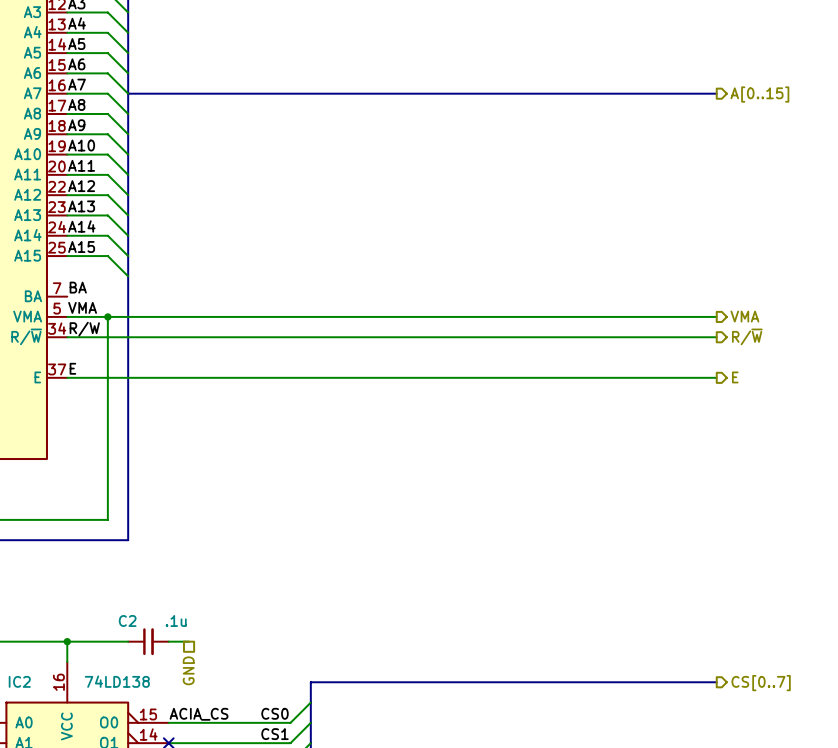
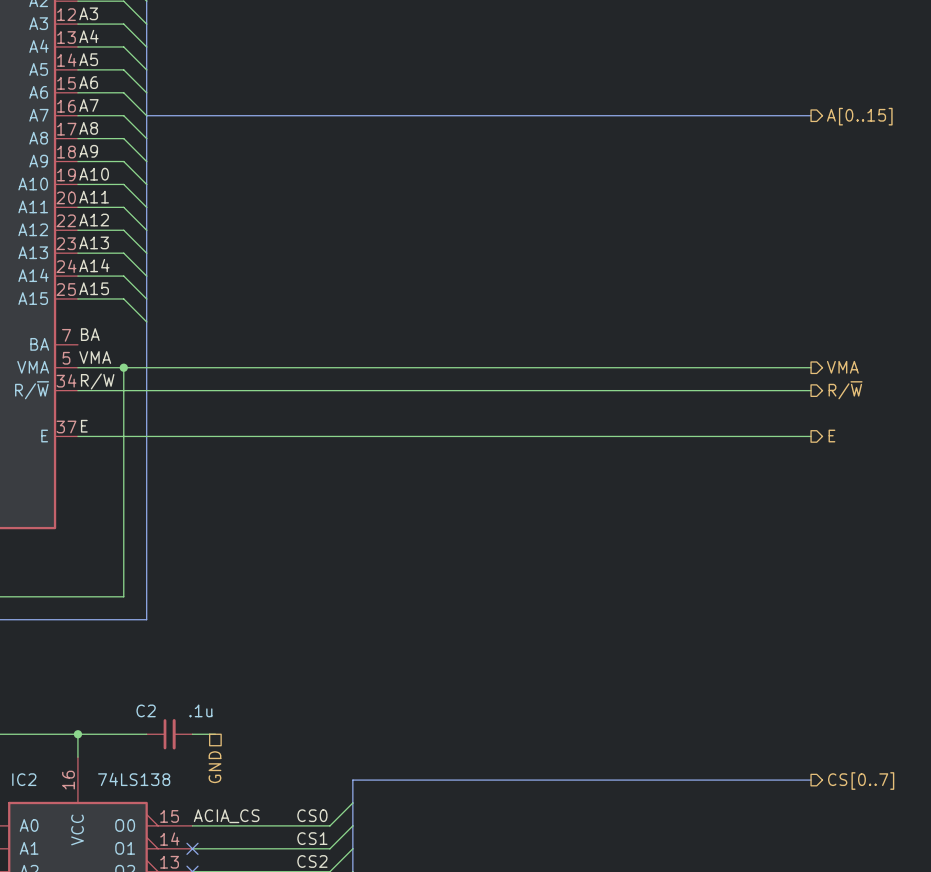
IC2 value: 74LD138 (117, 681) -> 74LS138 (134, 779)

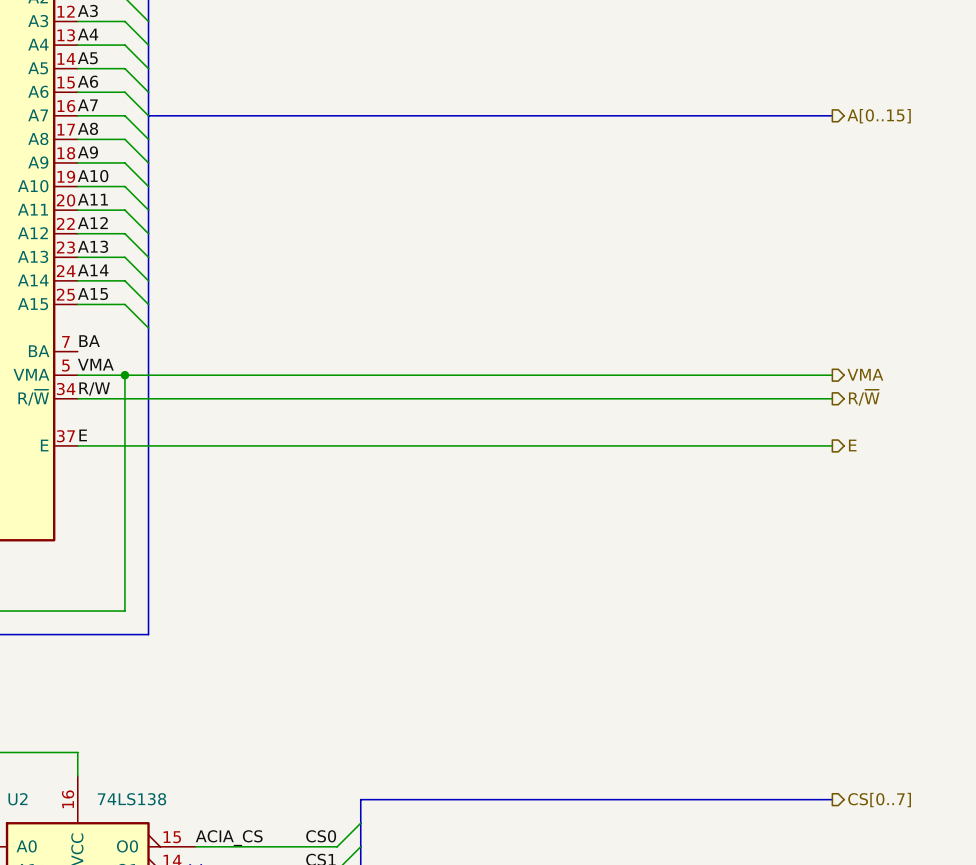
wire: (77, 734) (146, 734) -> none
junction: (77, 734) -> none
C2: .1u (169, 734) -> none
wire: (192, 734) (215, 734) -> none
hierarchical label: GND (214, 767) -> none
IC2 name: IC2 (24, 779) -> U2 (17, 799)

